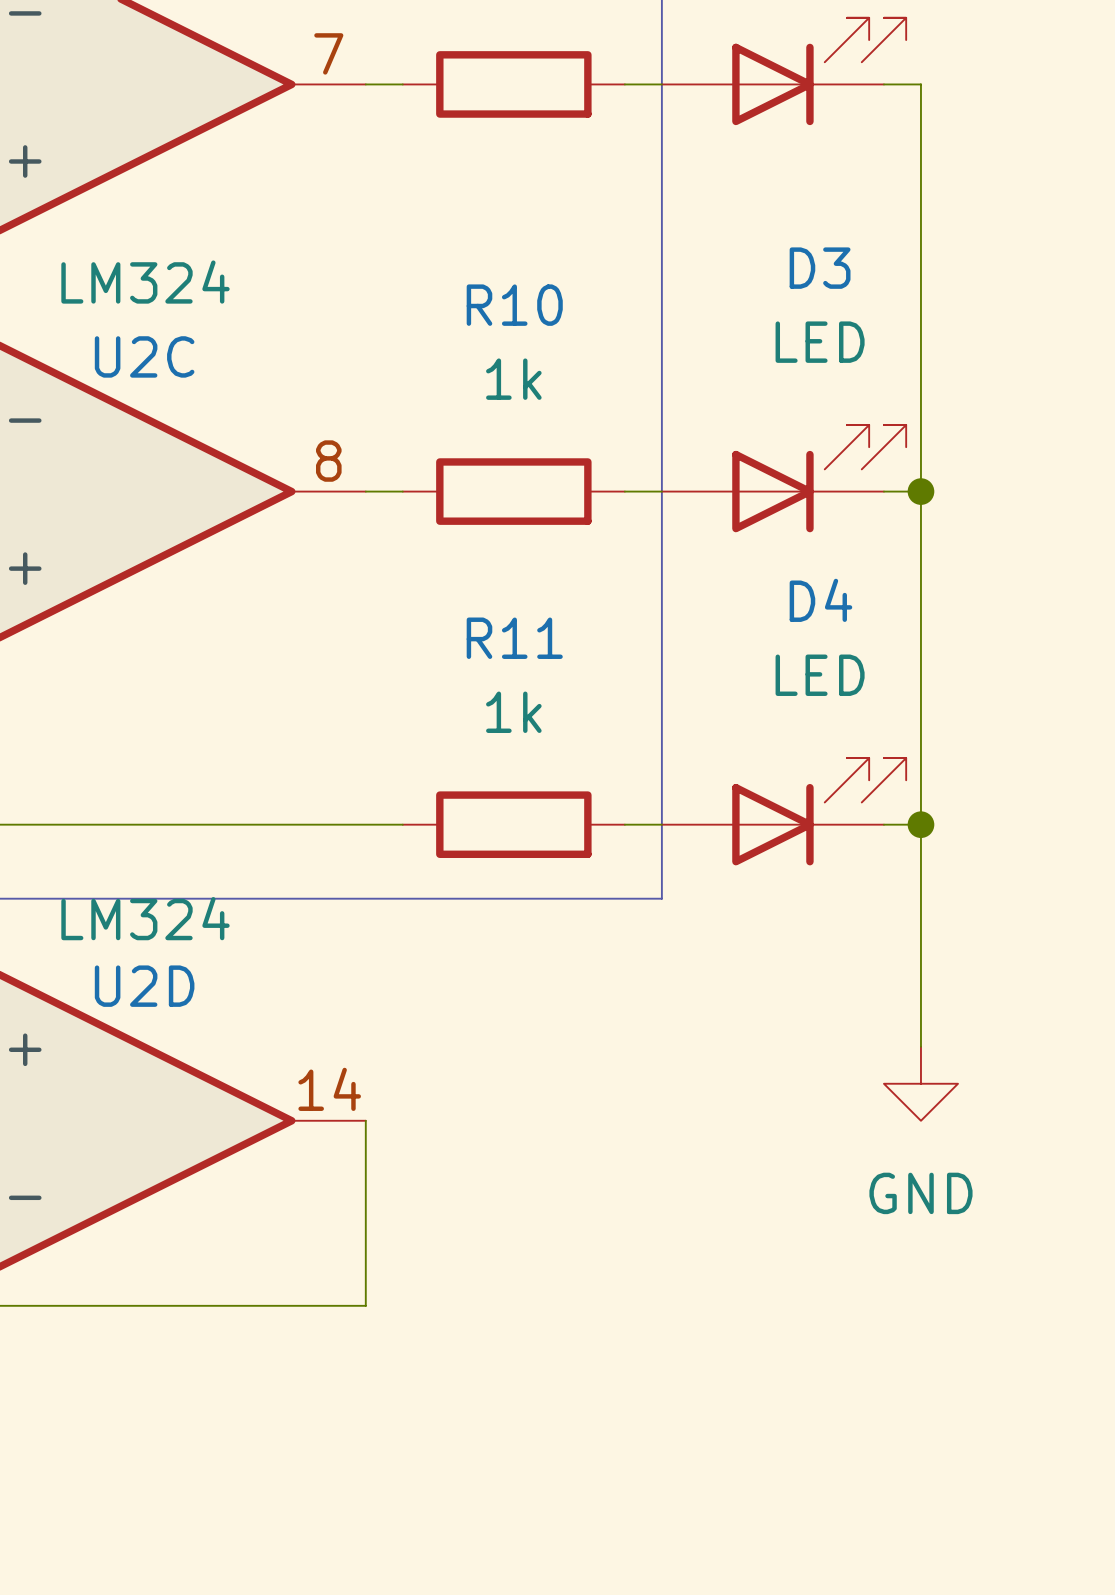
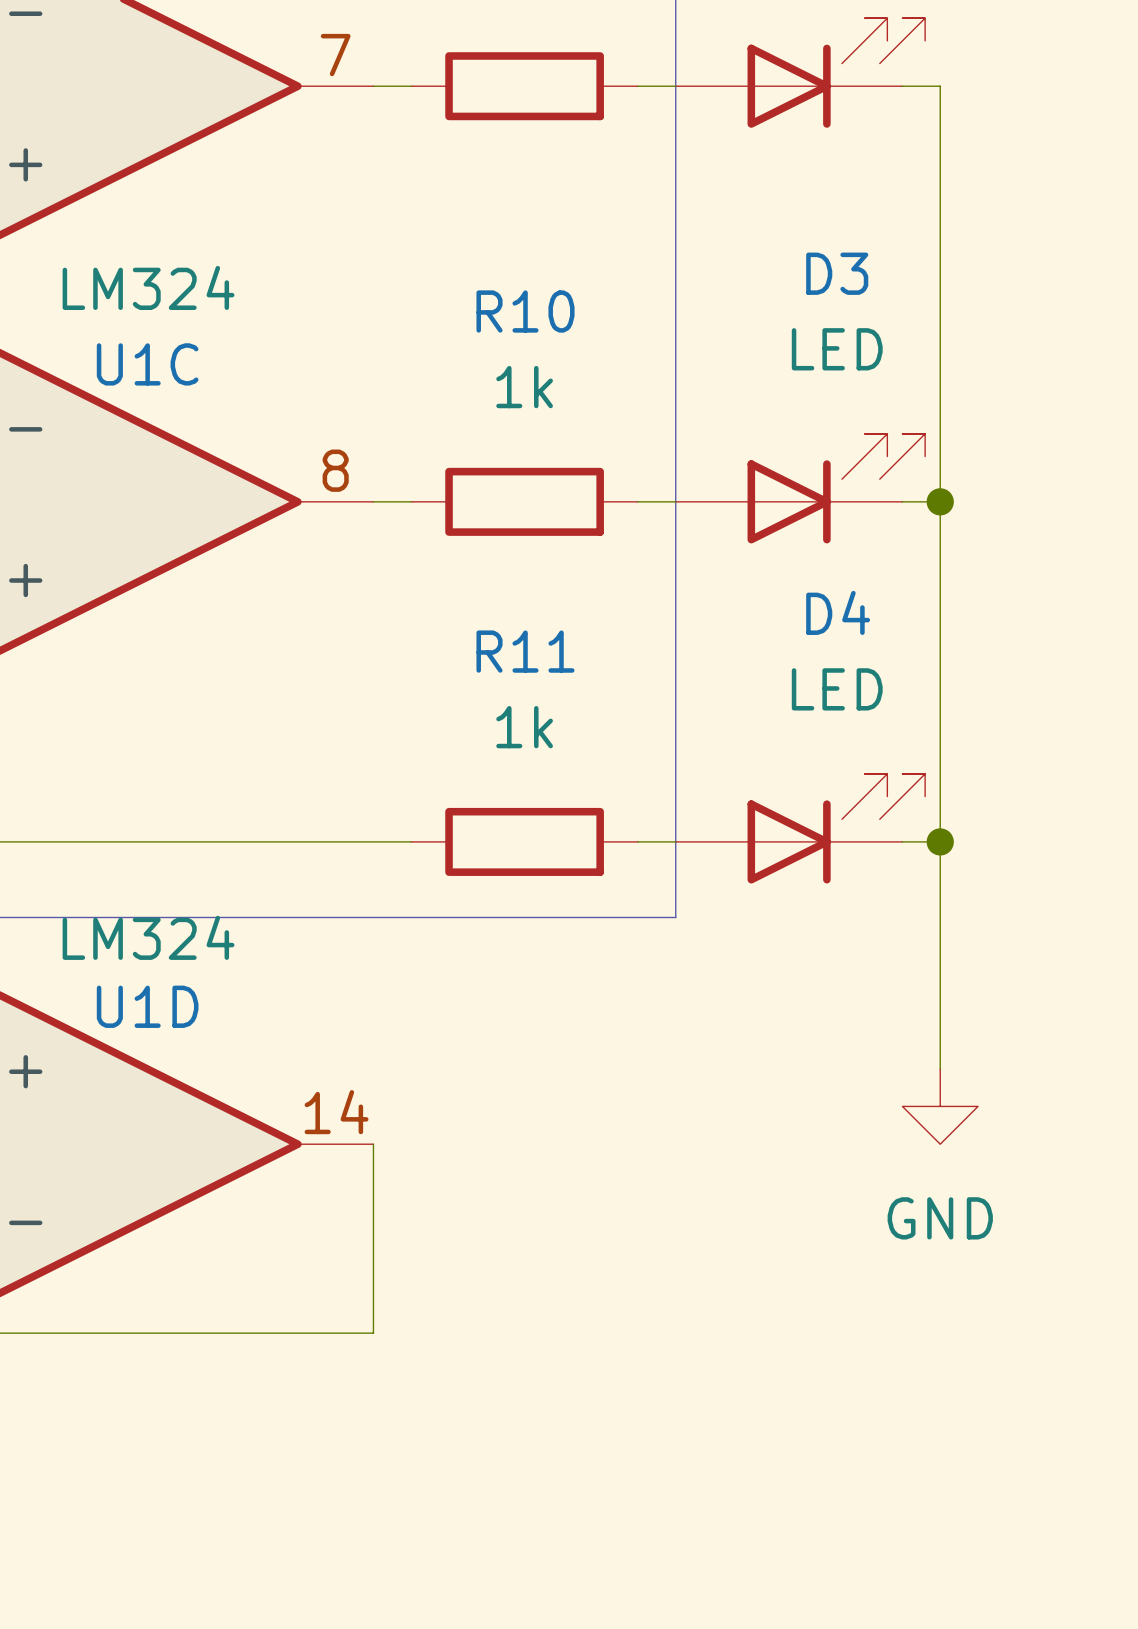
U2C name: U2C (144, 356) -> U1C (147, 364)
U2D name: U2D (144, 986) -> U1D (147, 1006)

